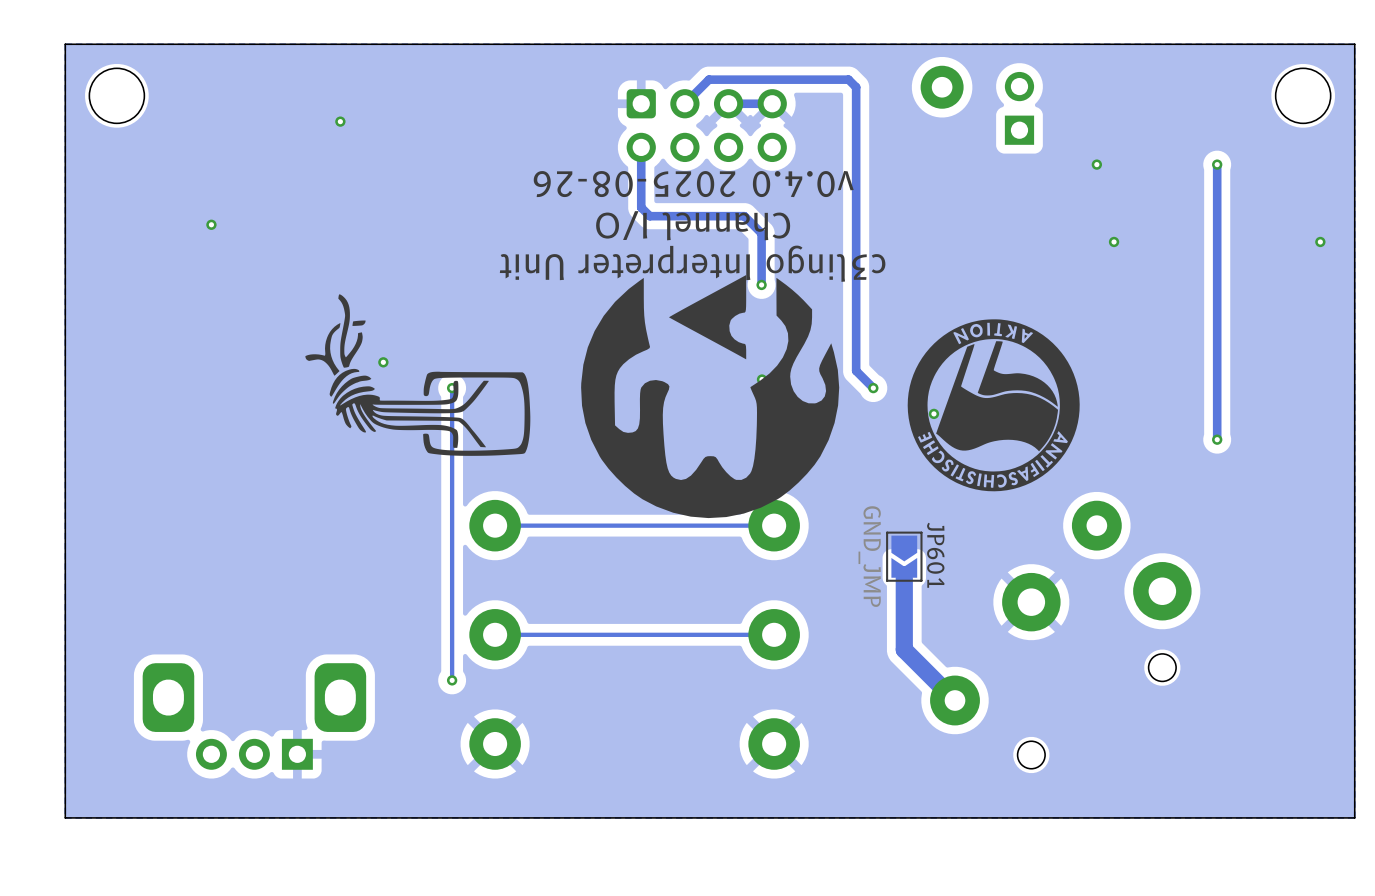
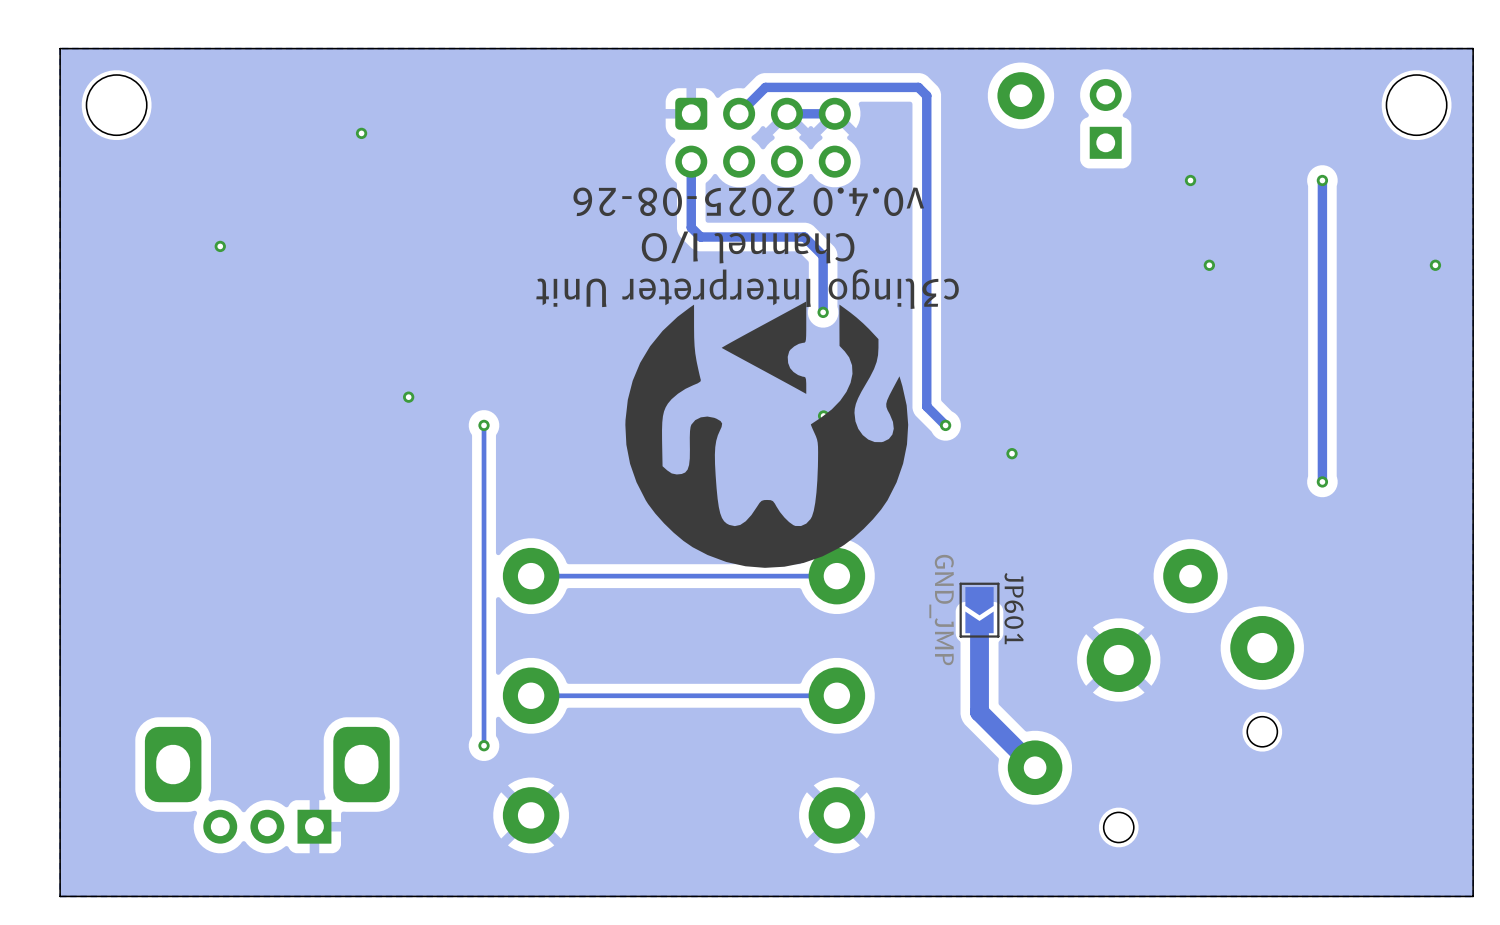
drawing: [305, 294, 531, 456] -> none
drawing: [907, 319, 1080, 492] -> none

